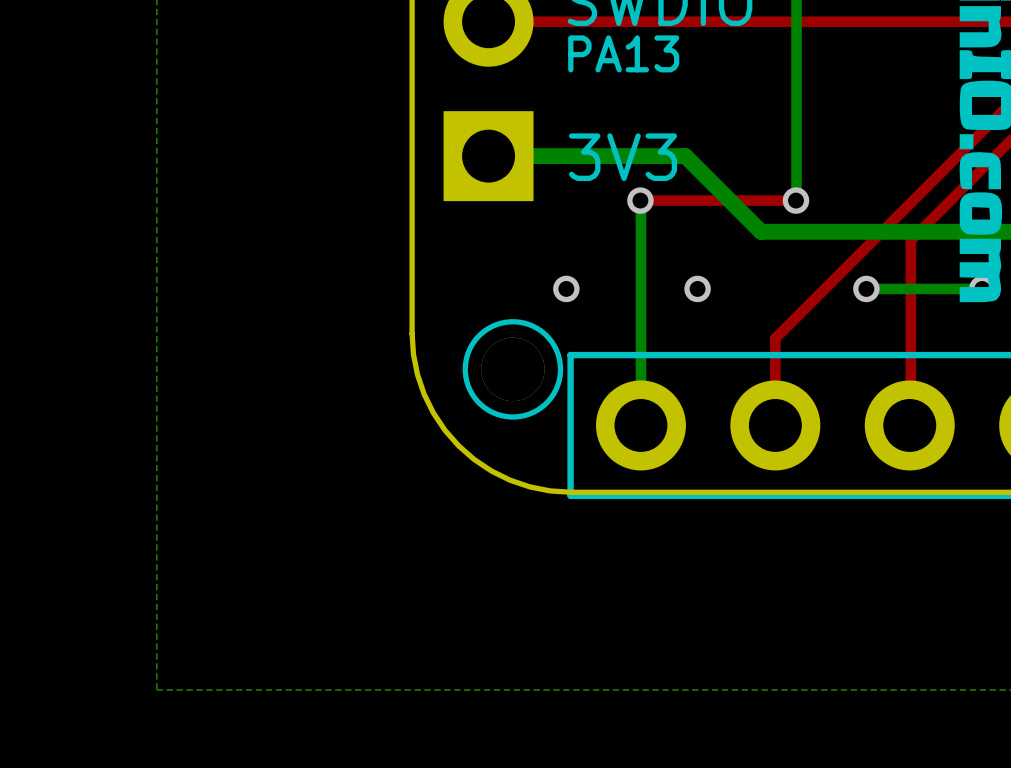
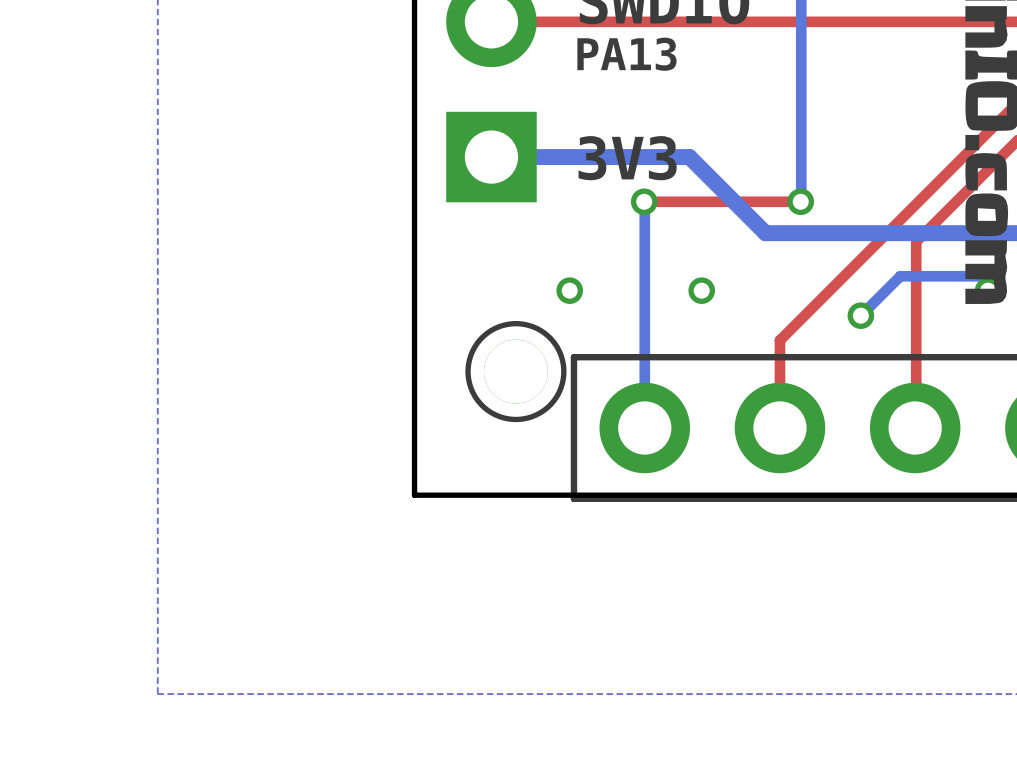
bottom track: none -> (988, 276) (900, 276) (860, 315)
via position: (866, 288) -> (860, 315)
bottom track: (982, 288) (866, 288) -> none
board edge: (412, 333) (417, 374) (424, 394) (444, 430) (458, 445) (491, 471) (510, 480) (550, 490) (570, 492) -> (414, 335) (414, 495) (574, 495)

